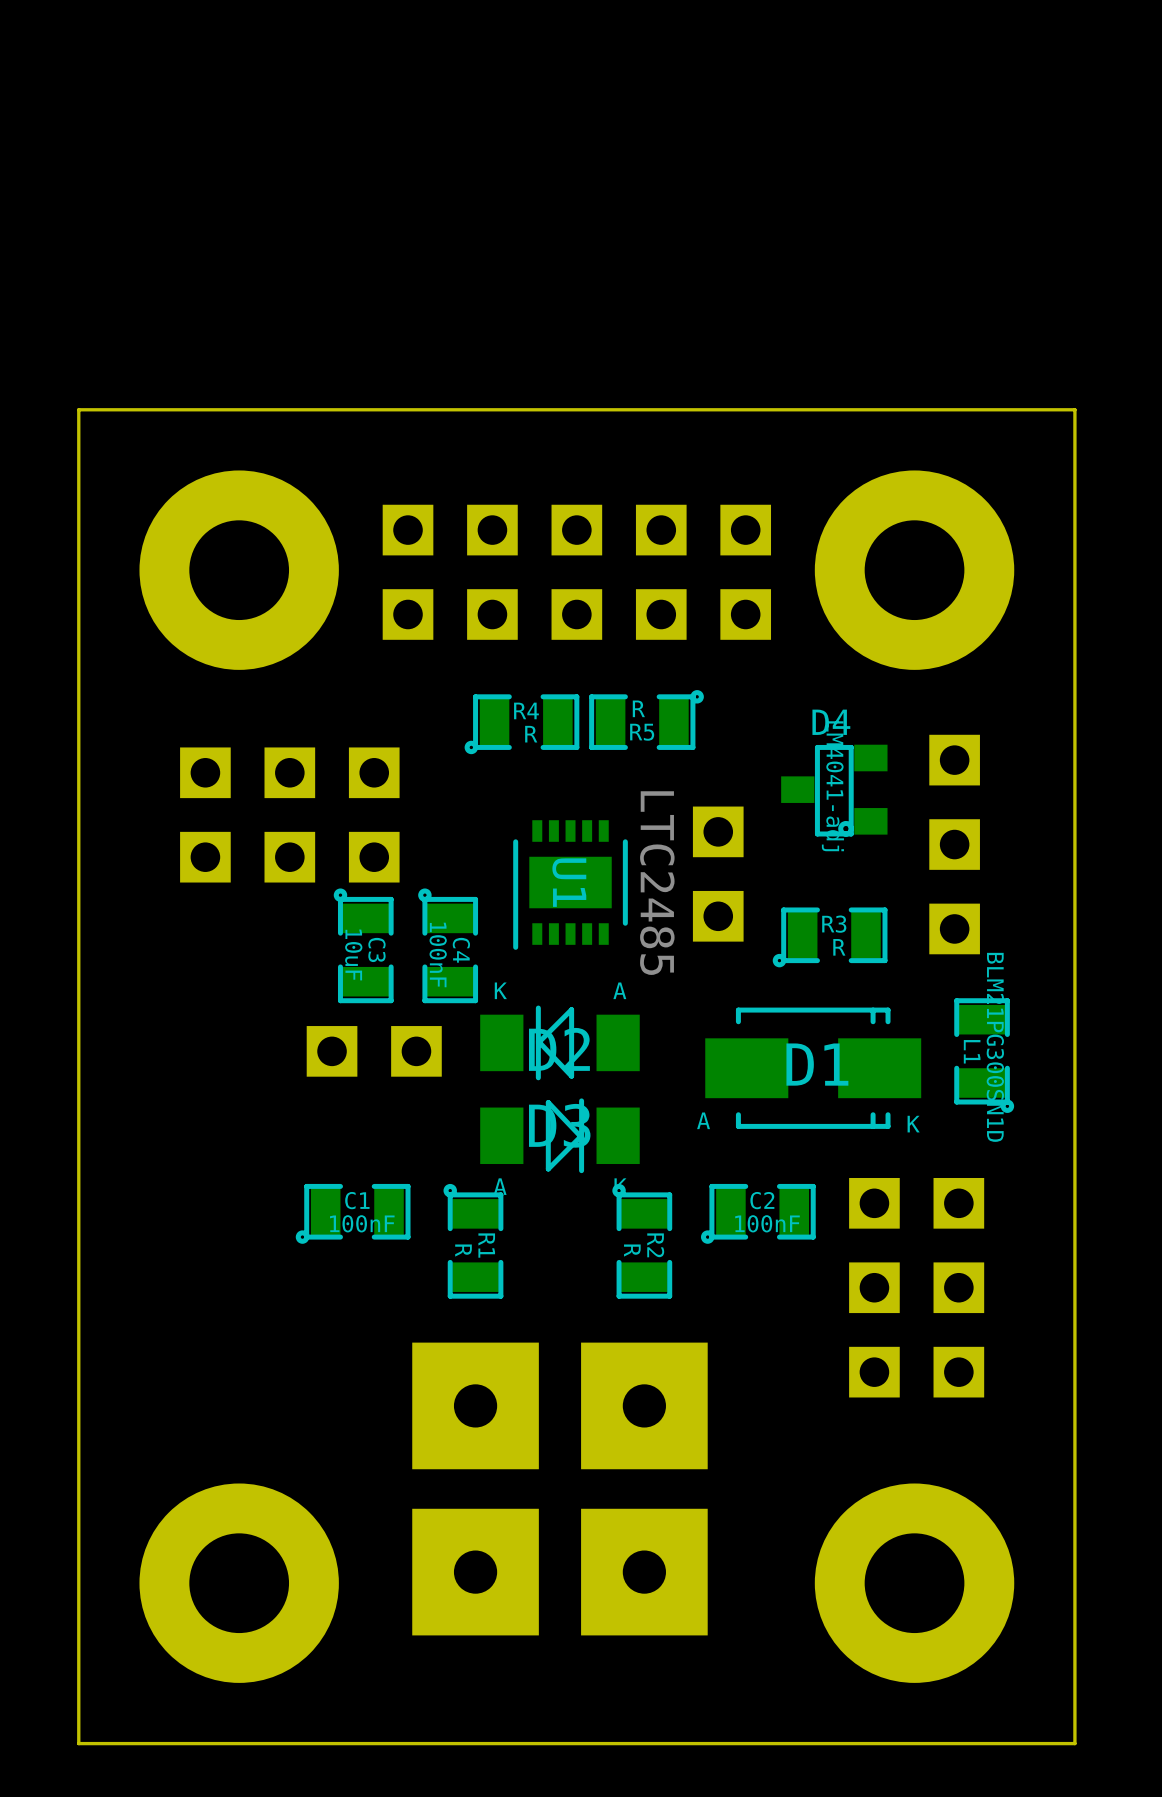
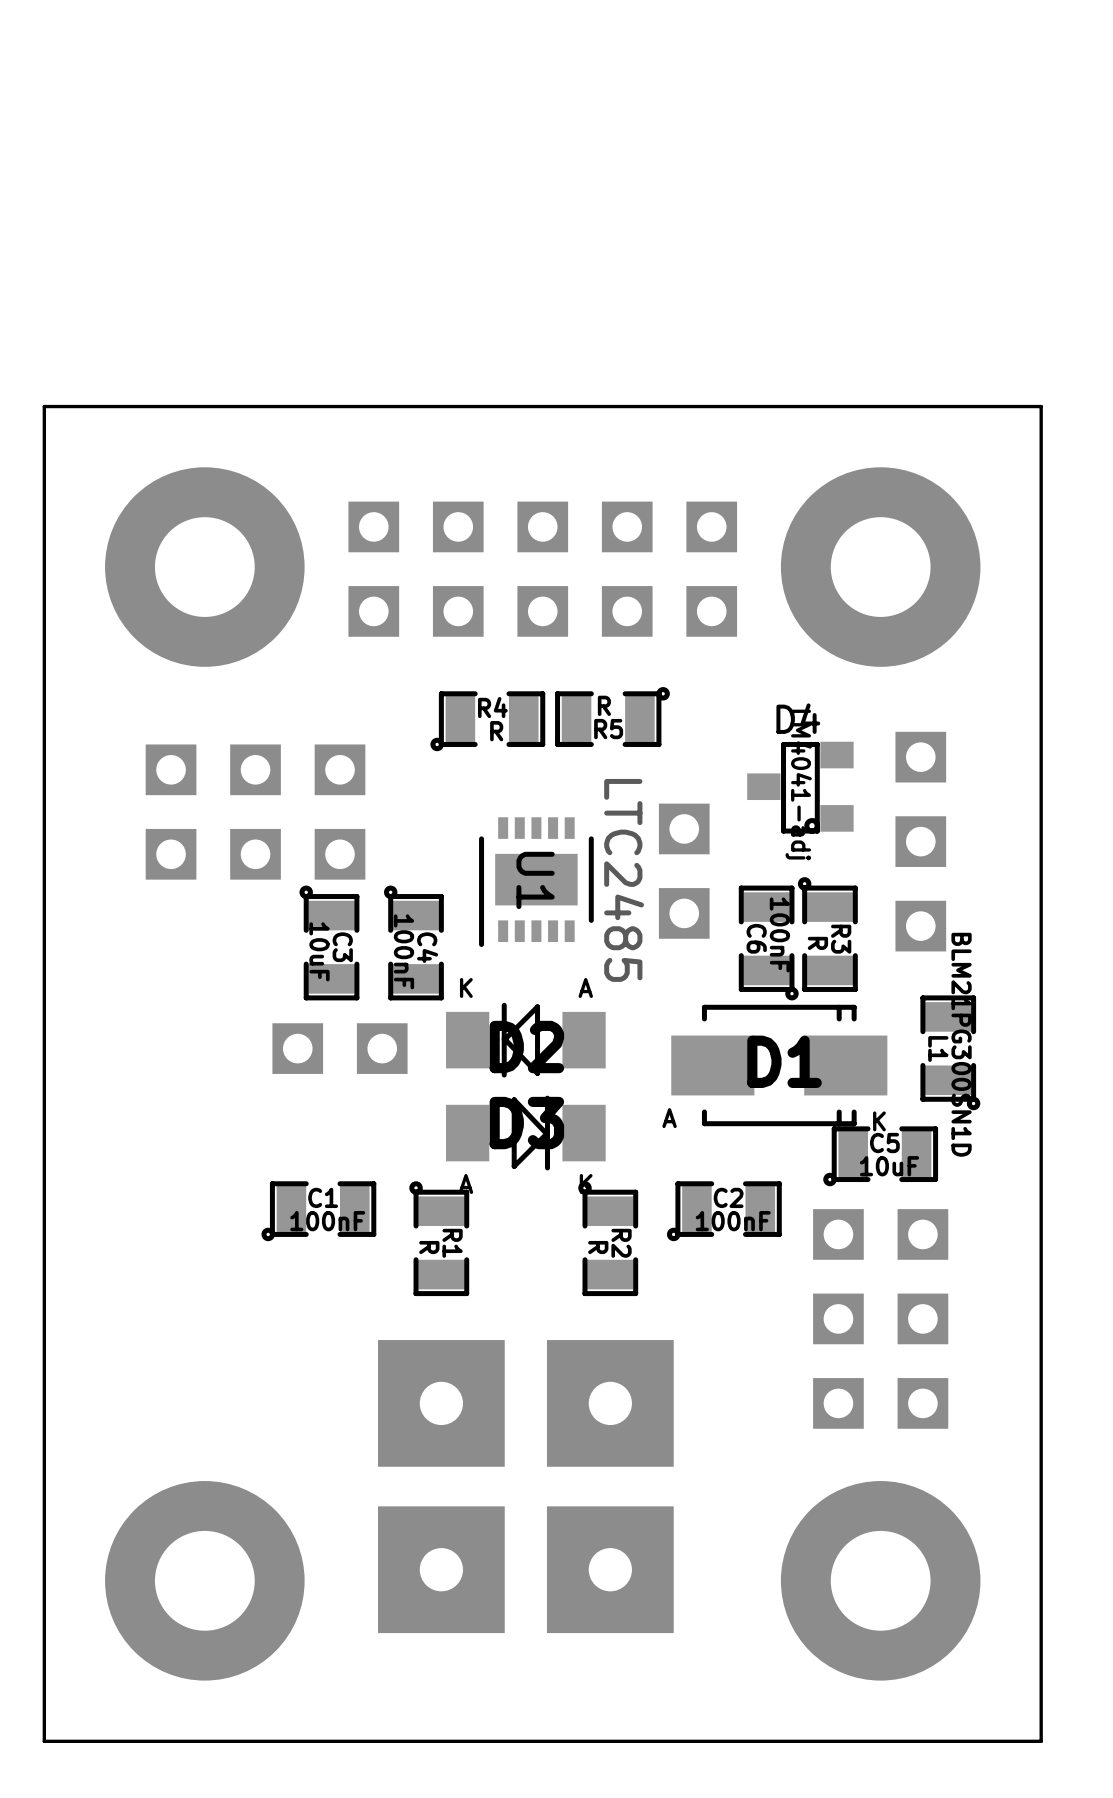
R3 rotation: 0° (830, 937) -> 90° clockwise (827, 934)
C6: none -> 100nF (768, 942)
C5: none -> 10uF (880, 1156)
part position: (916, 1287) -> (880, 1318)

